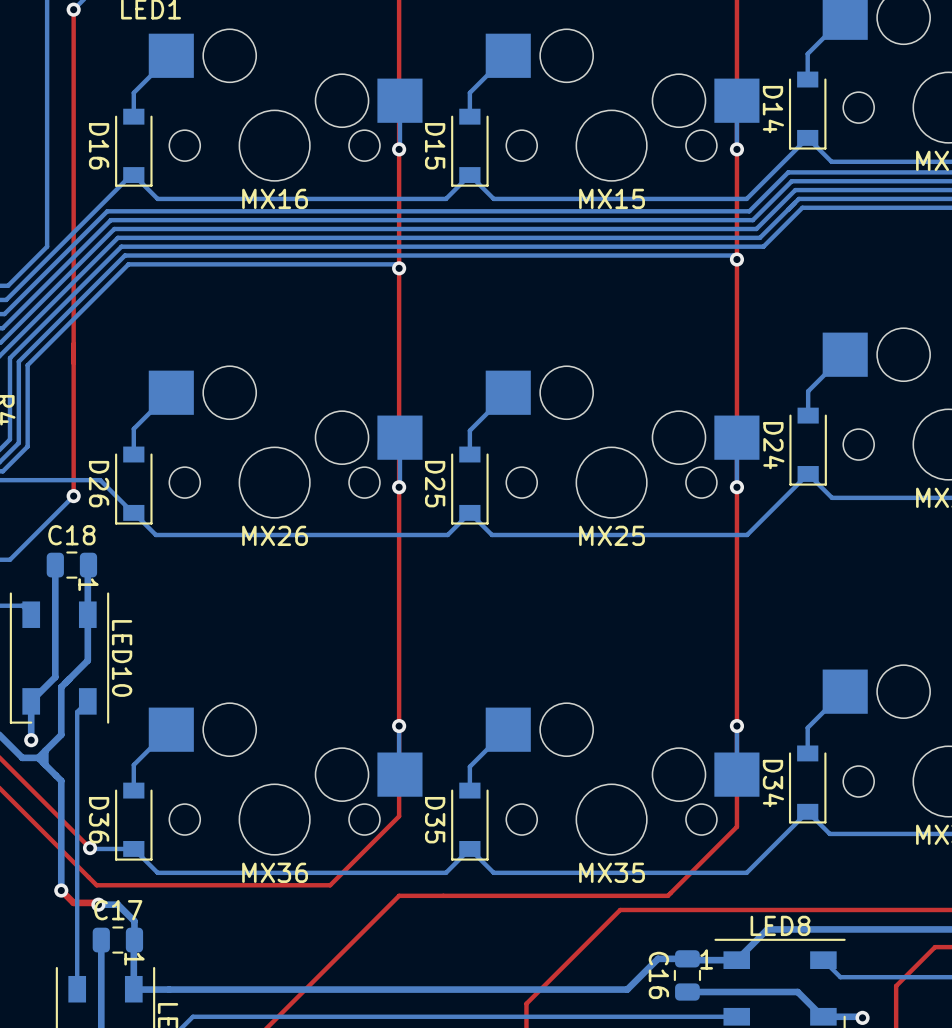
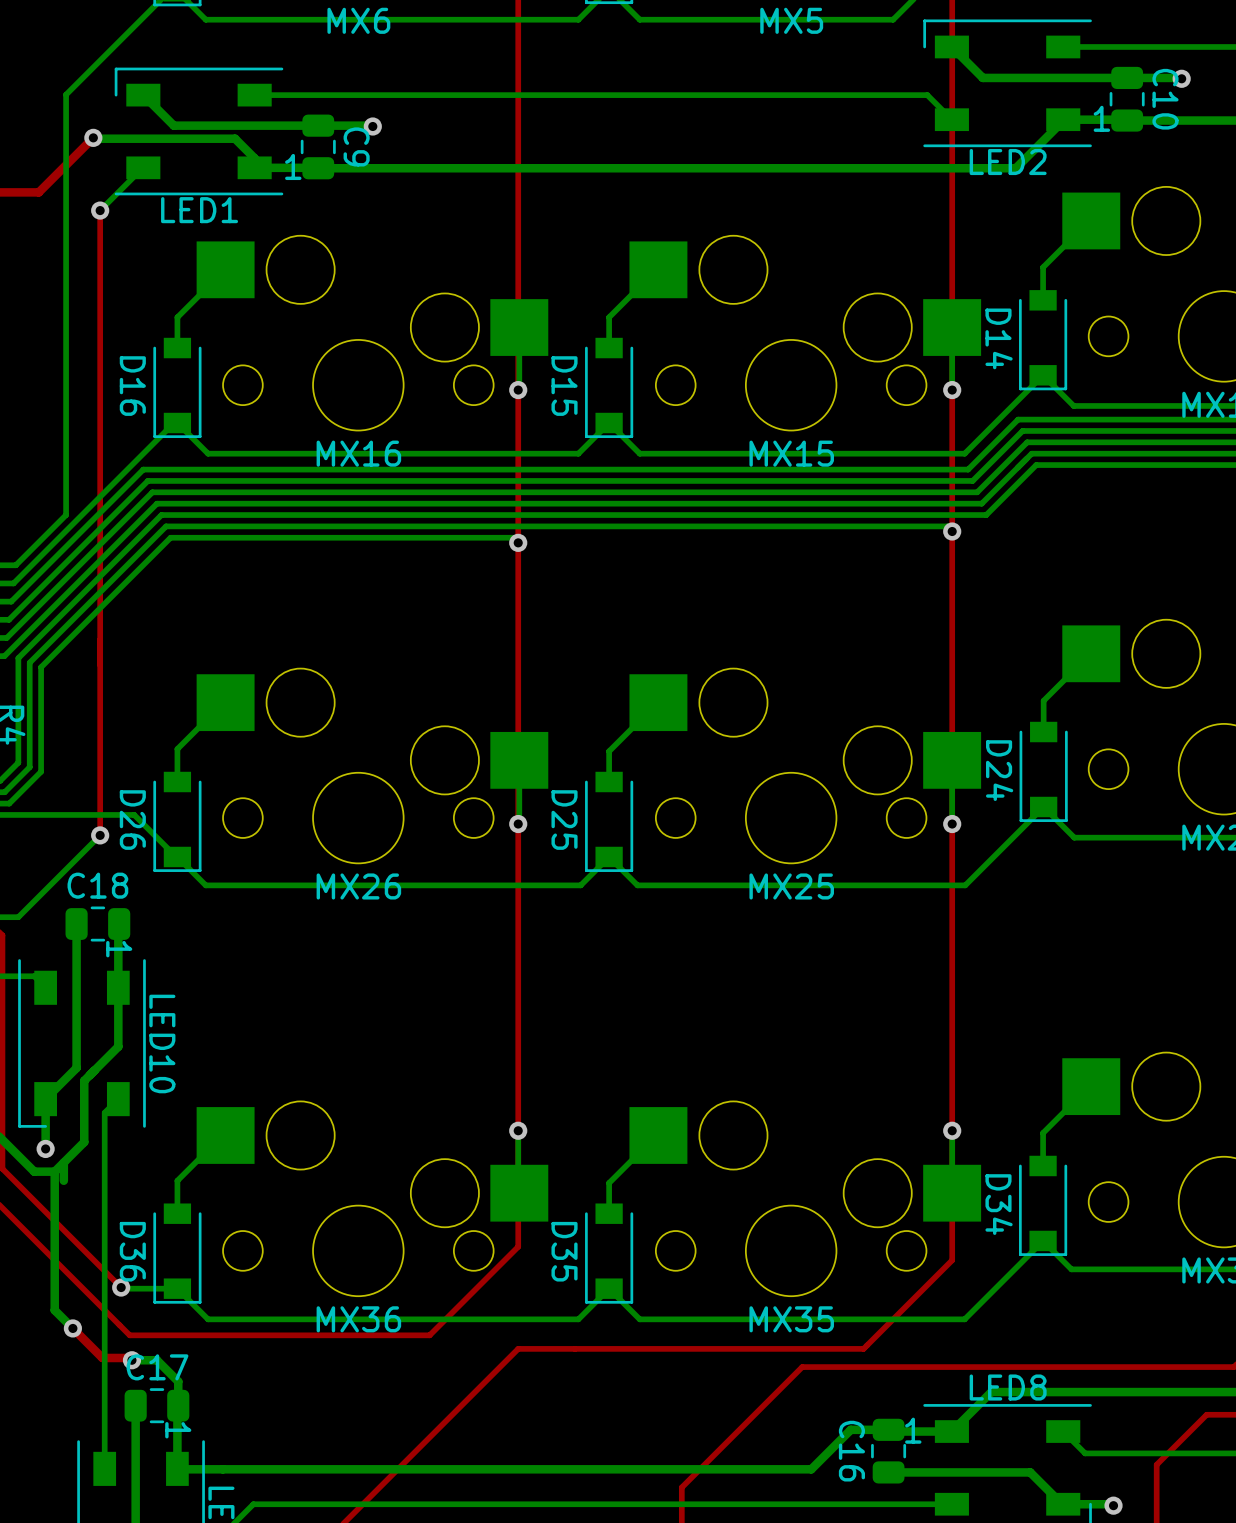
bottom track: (38, 757) (61, 780) (61, 890) -> (54, 1171) (54, 1310) (72, 1328)
top track: (61, 890) (75, 902) -> (72, 1328) (102, 1357)
via position: (61, 890) -> (72, 1328)

